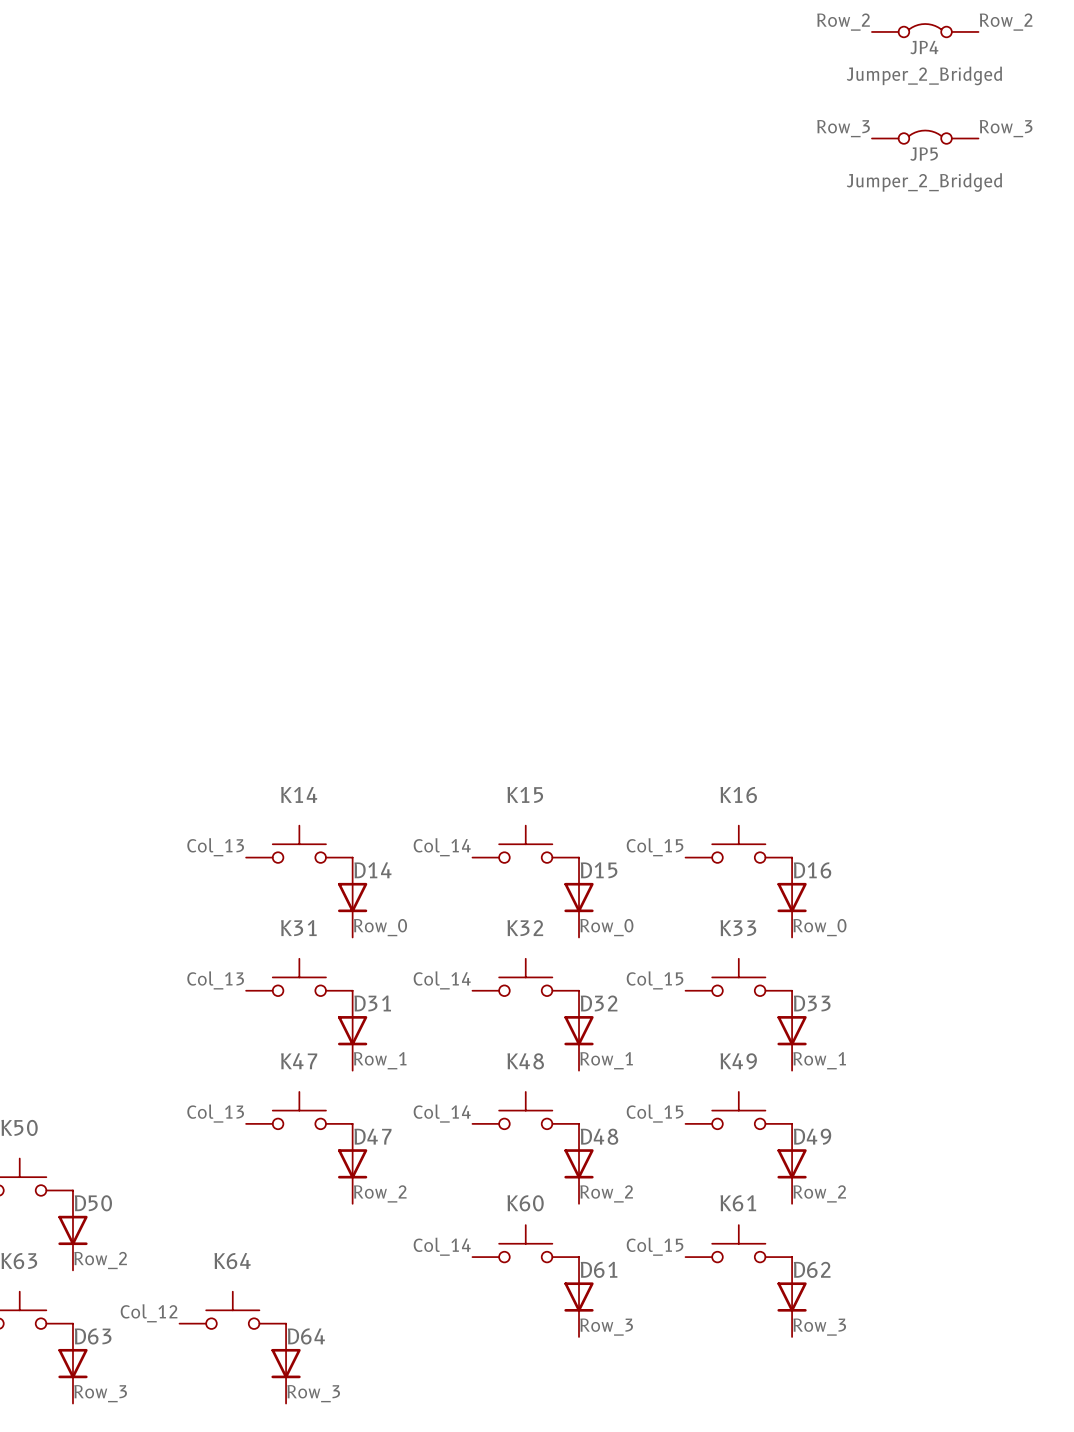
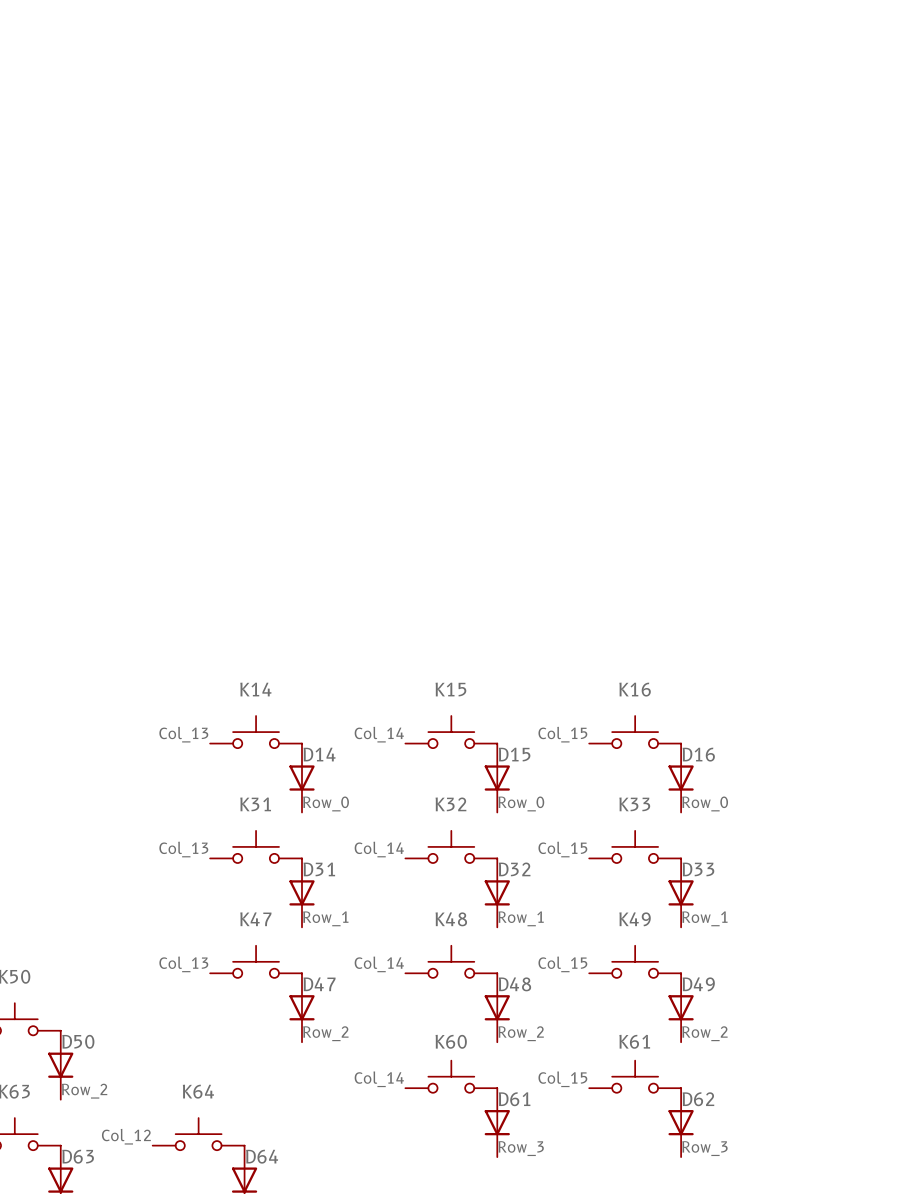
label: Row_2 (843, 22) -> none
label: Row_2 (1006, 22) -> none
JP4: Jumper_2_Bridged (925, 30) -> none
label: Row_3 (843, 128) -> none
label: Row_3 (1006, 128) -> none
JP5: Jumper_2_Bridged (925, 137) -> none

